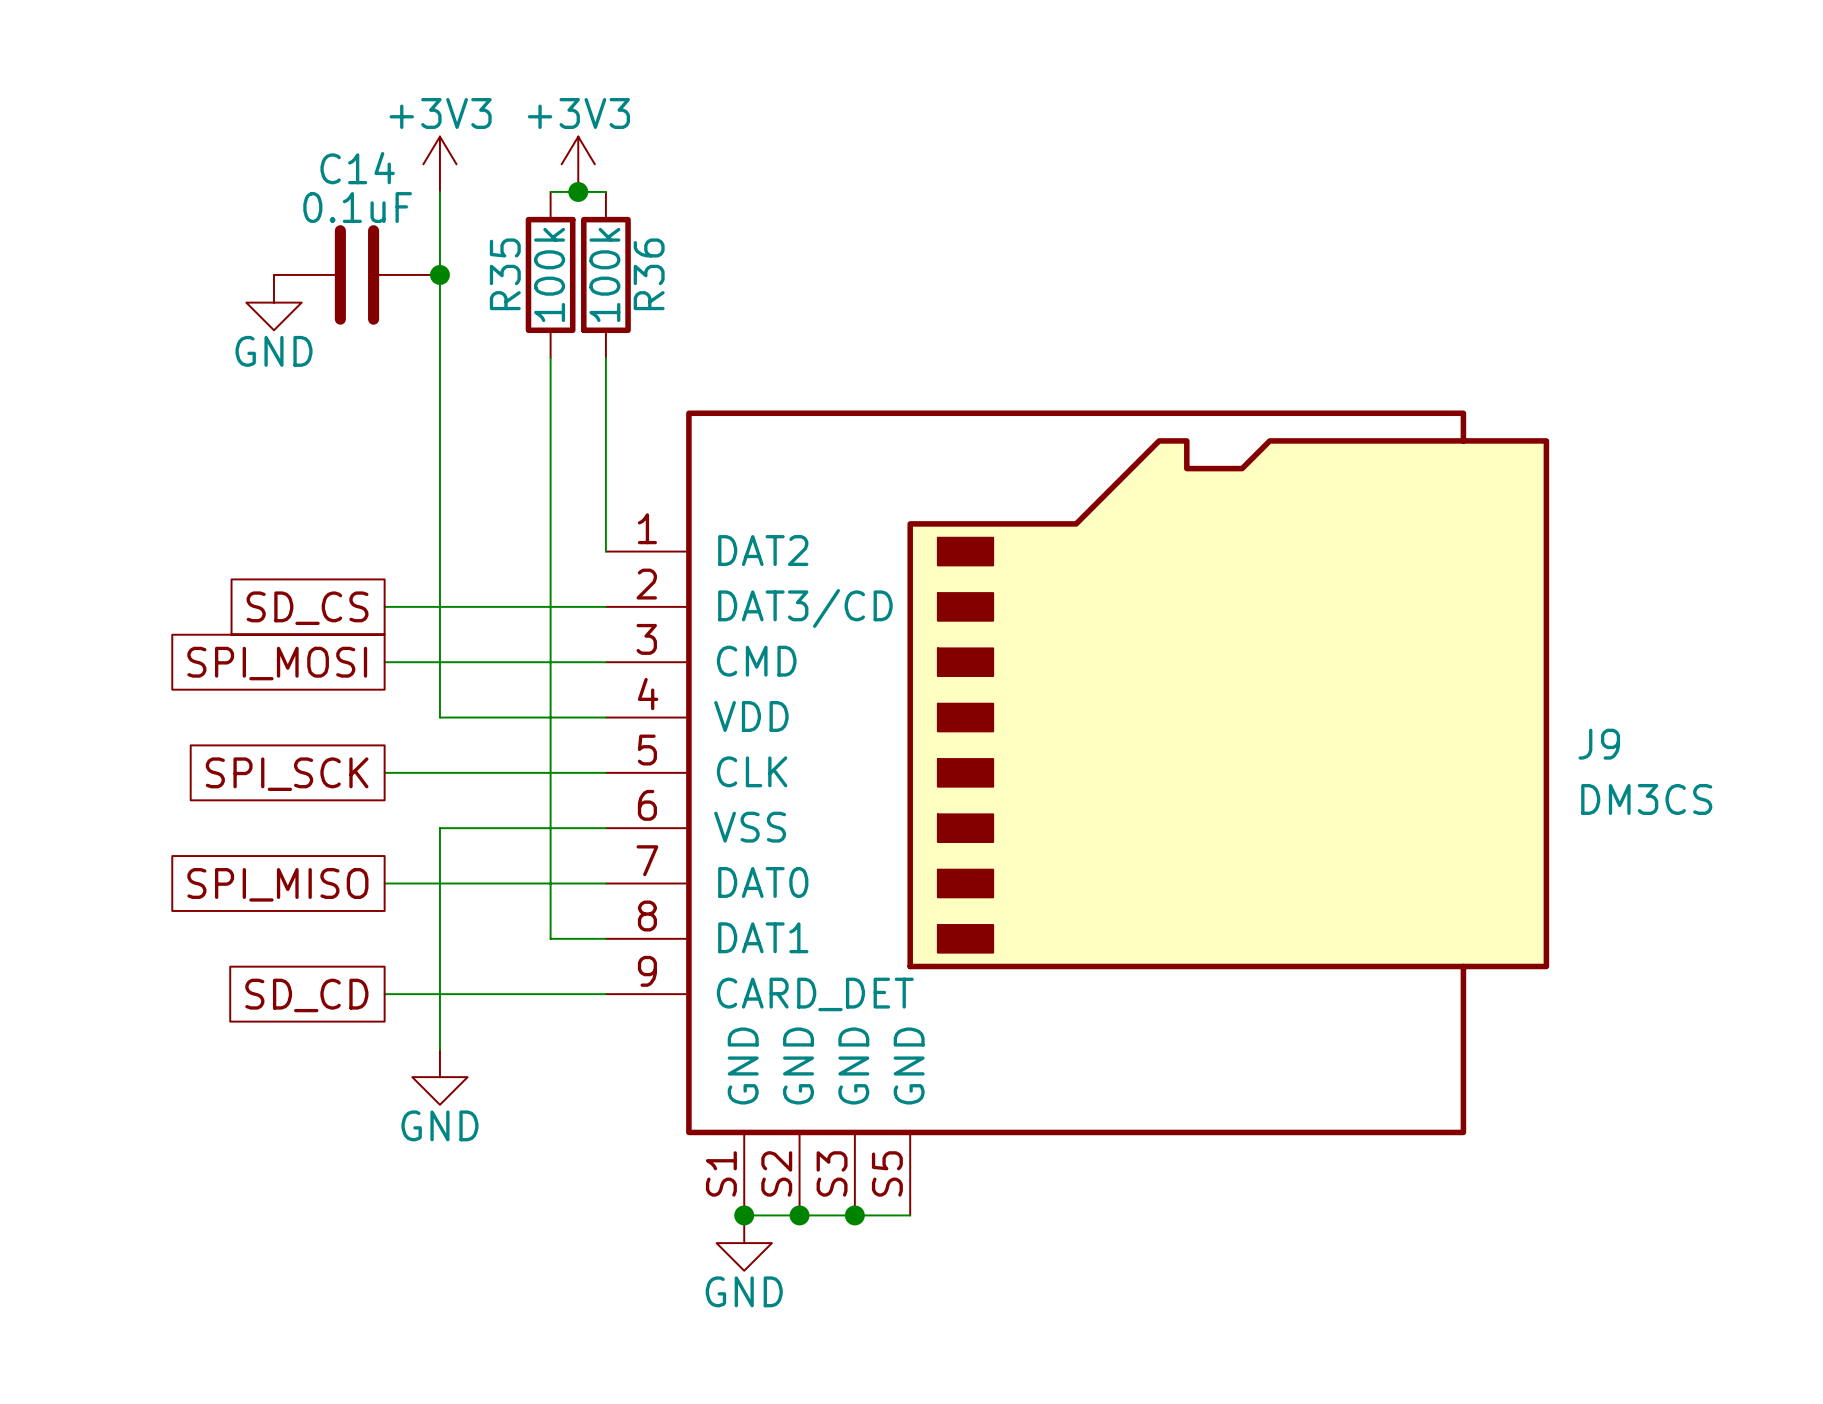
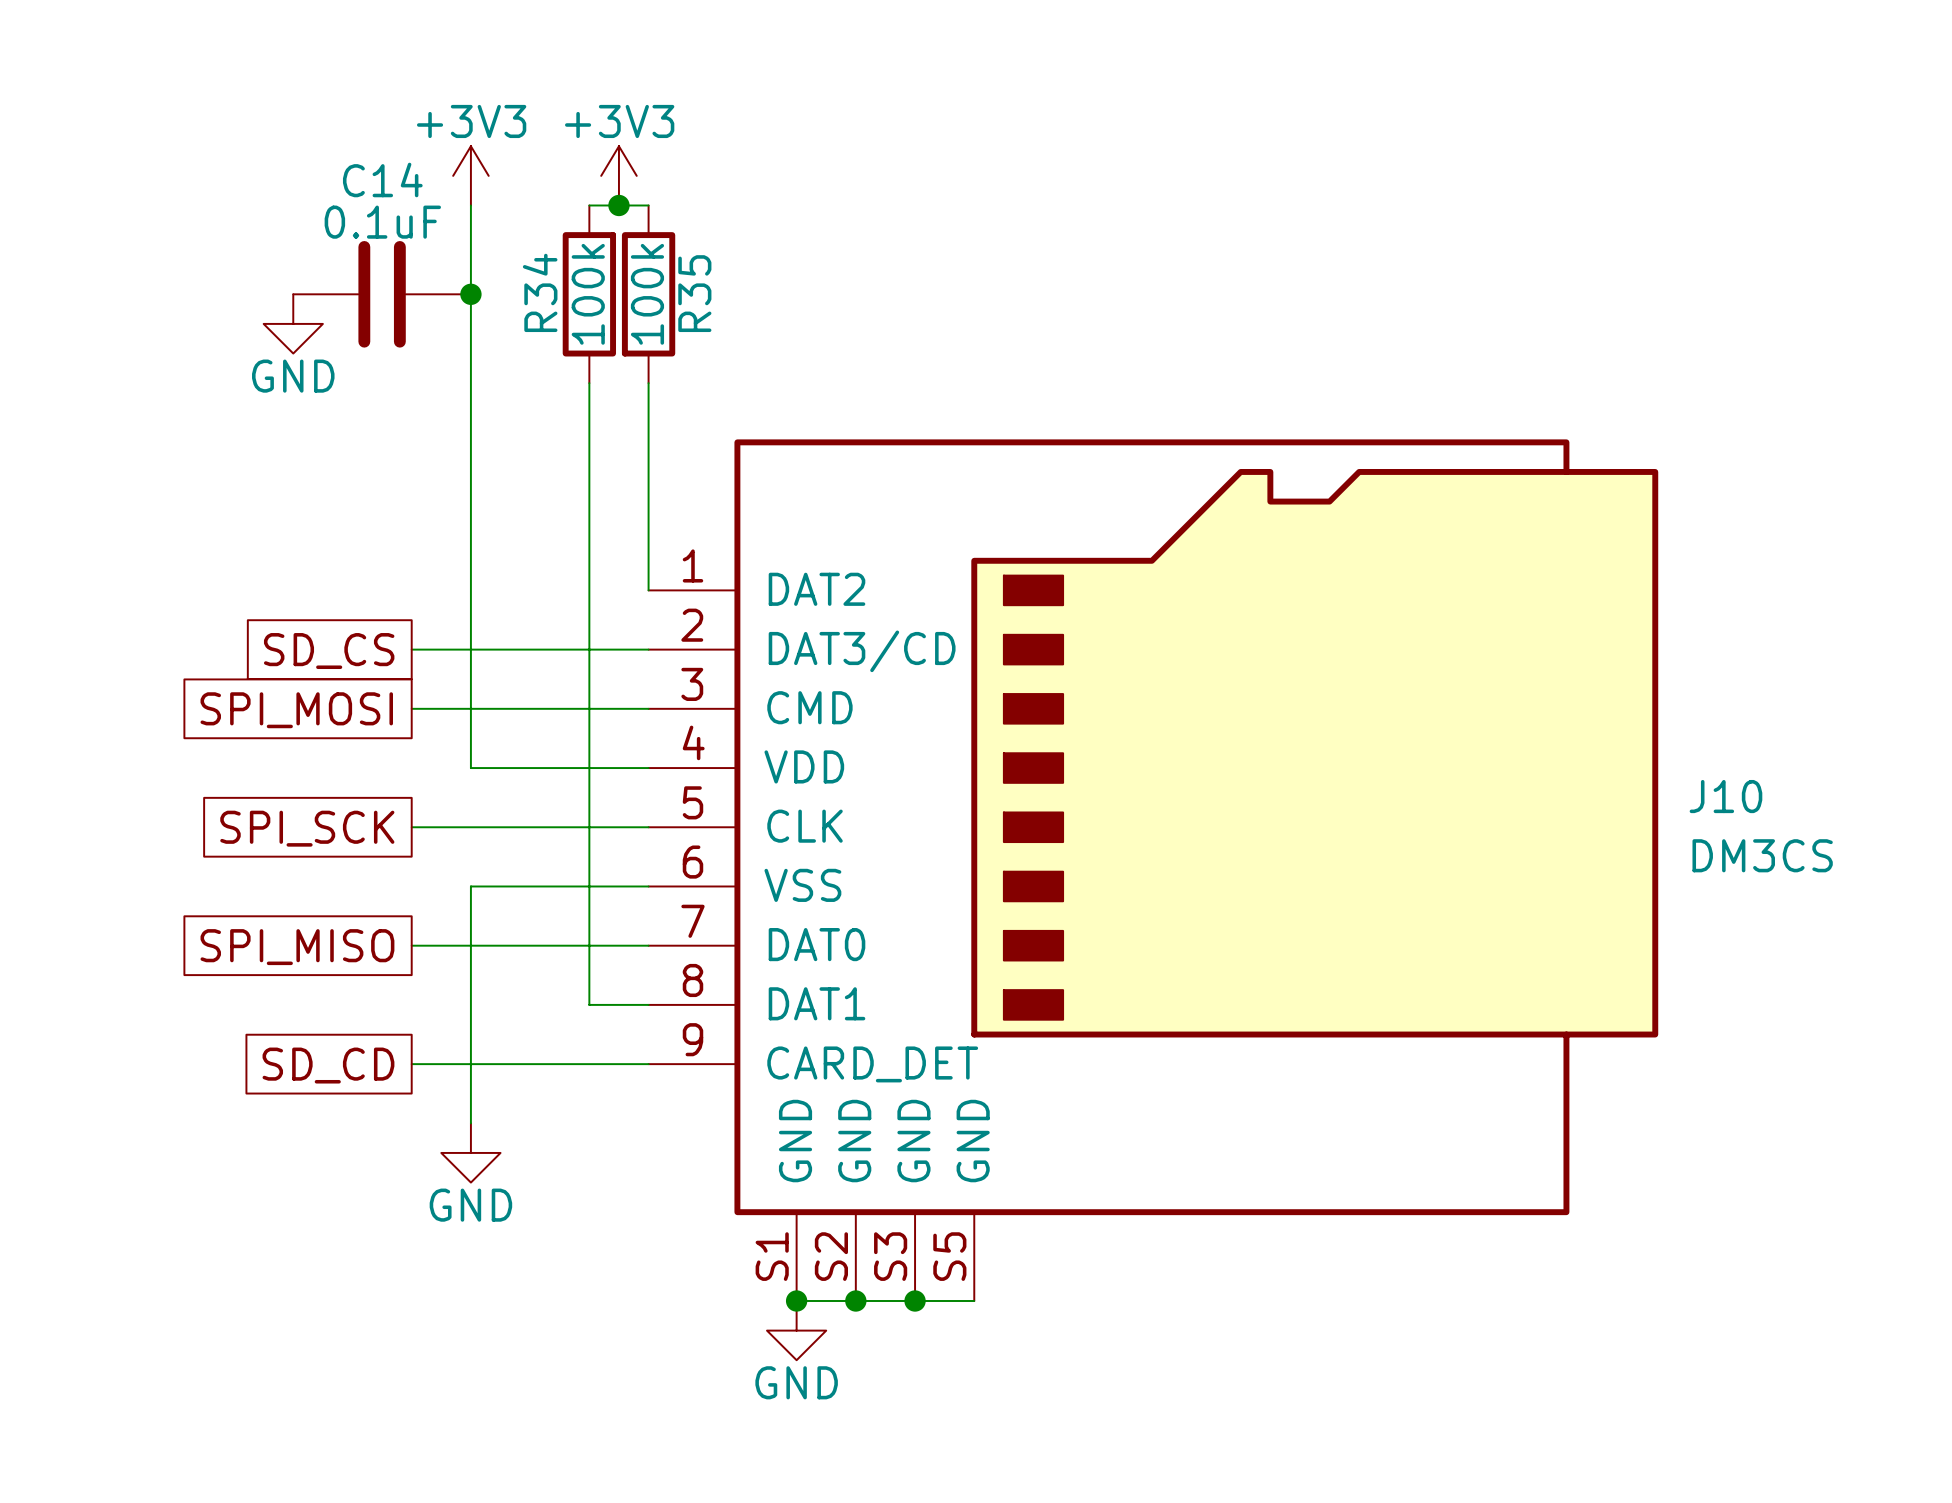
R35 name: R35 (505, 274) -> R34 (540, 292)
R36 name: R36 (649, 274) -> R35 (694, 293)
J9 name: J9 (1599, 744) -> J10 (1725, 796)

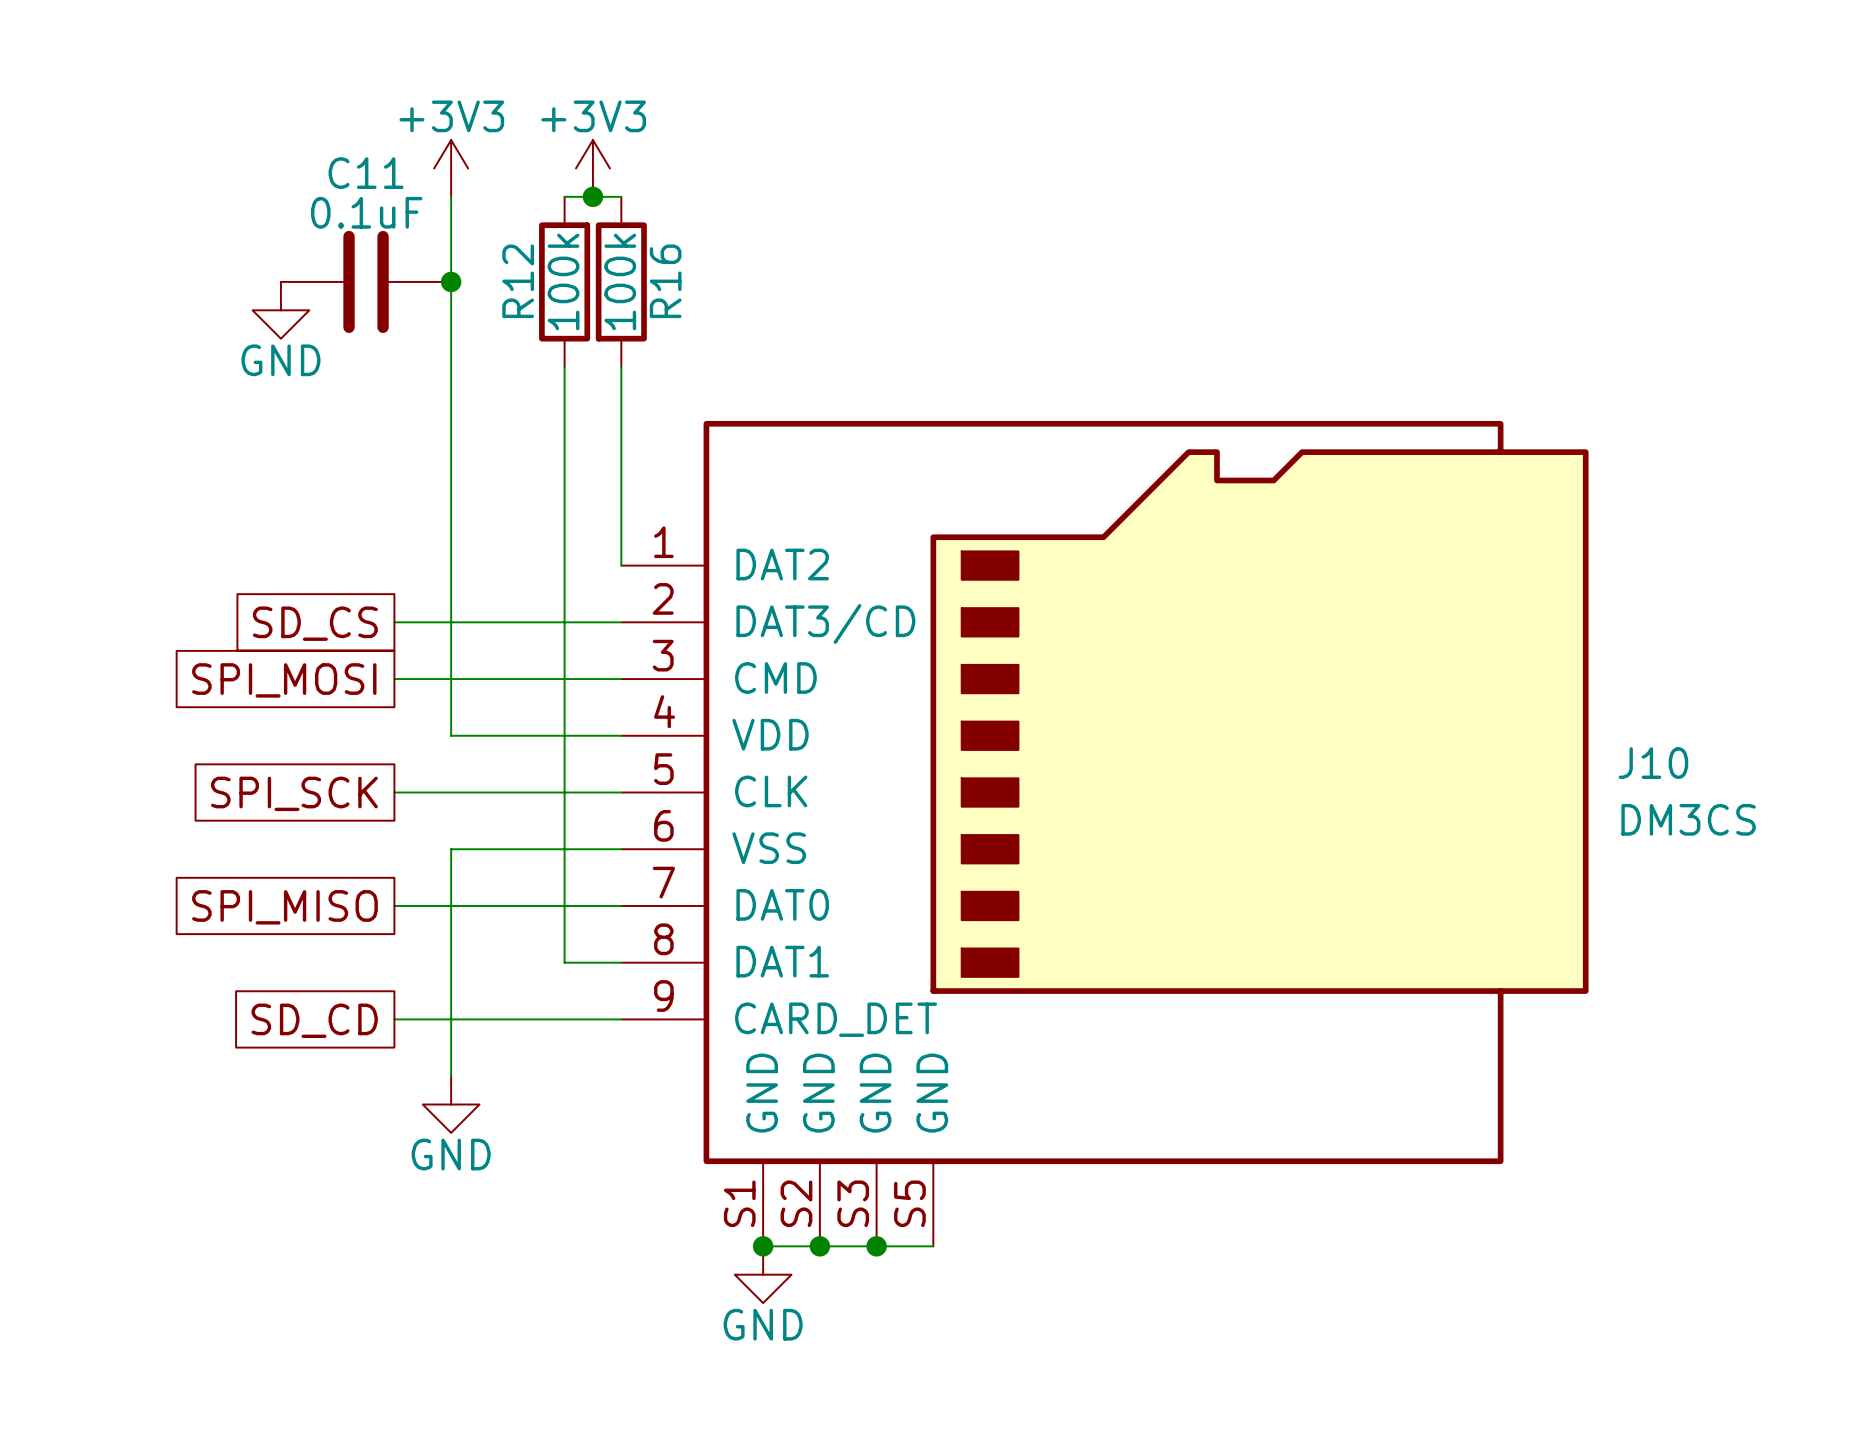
C14 name: C14 (382, 179) -> C11 (366, 173)
R34 name: R34 (540, 292) -> R12 (518, 281)
R35 name: R35 (694, 293) -> R16 (665, 281)

